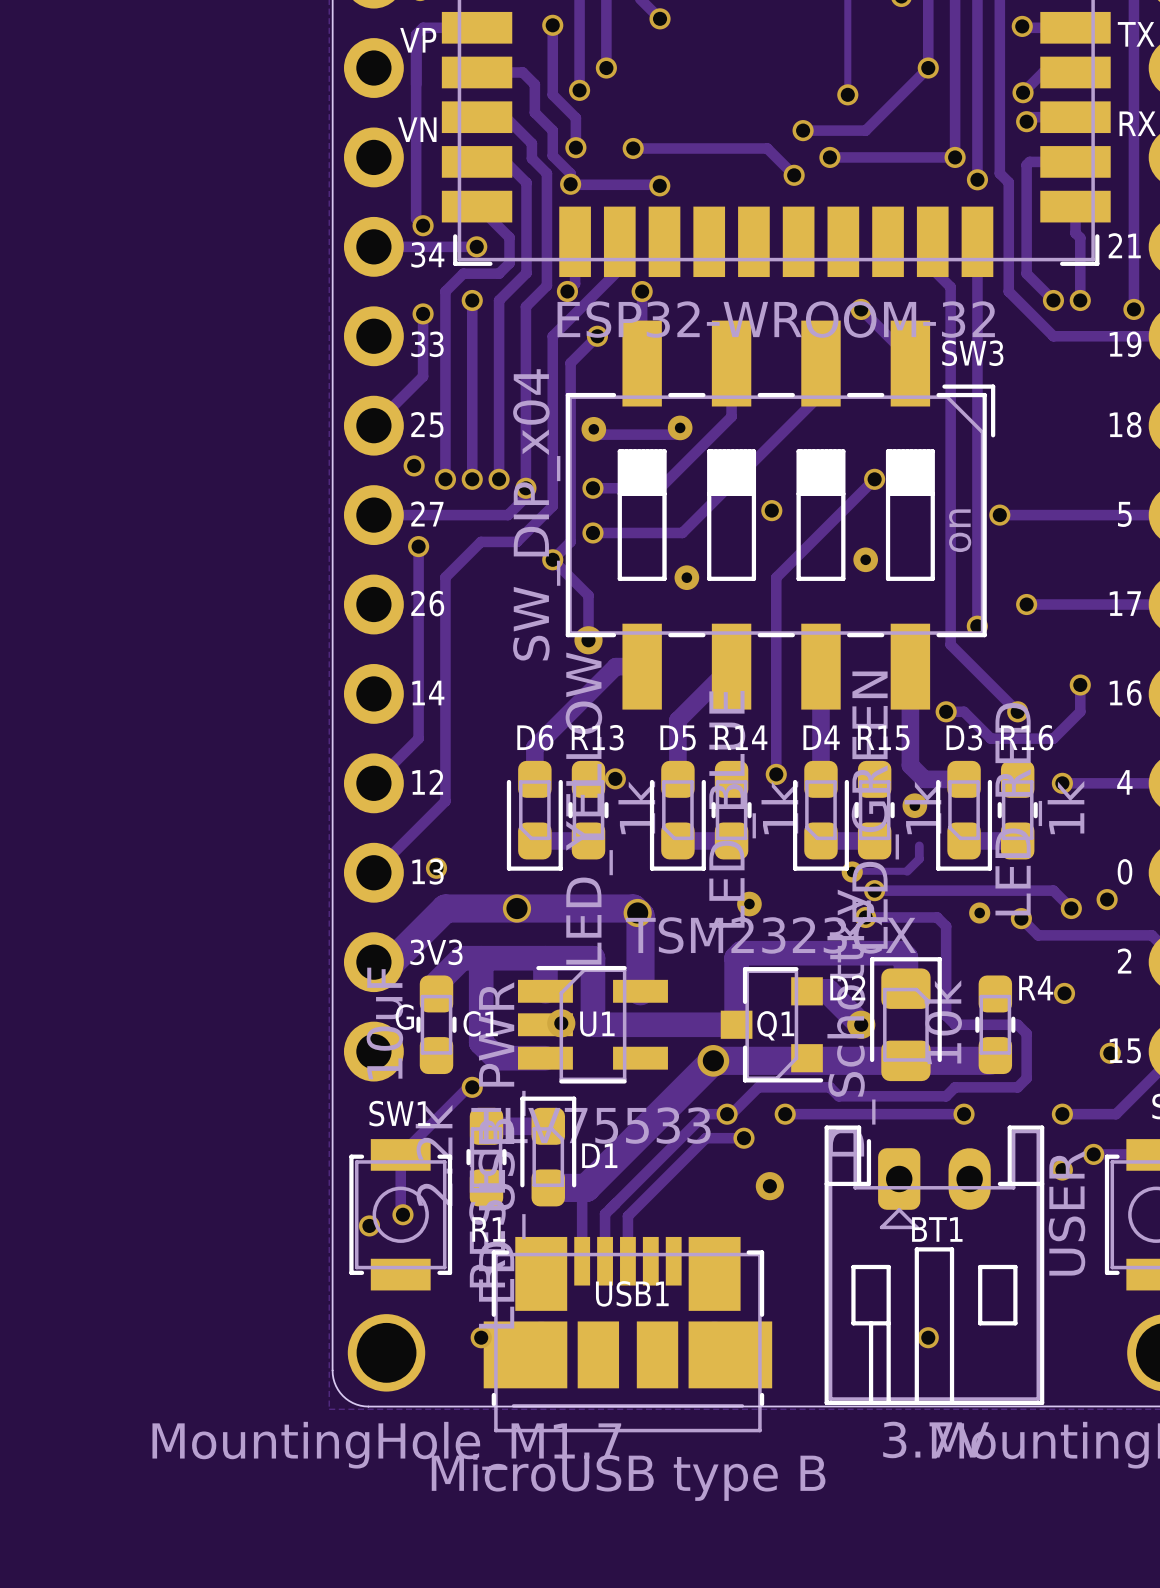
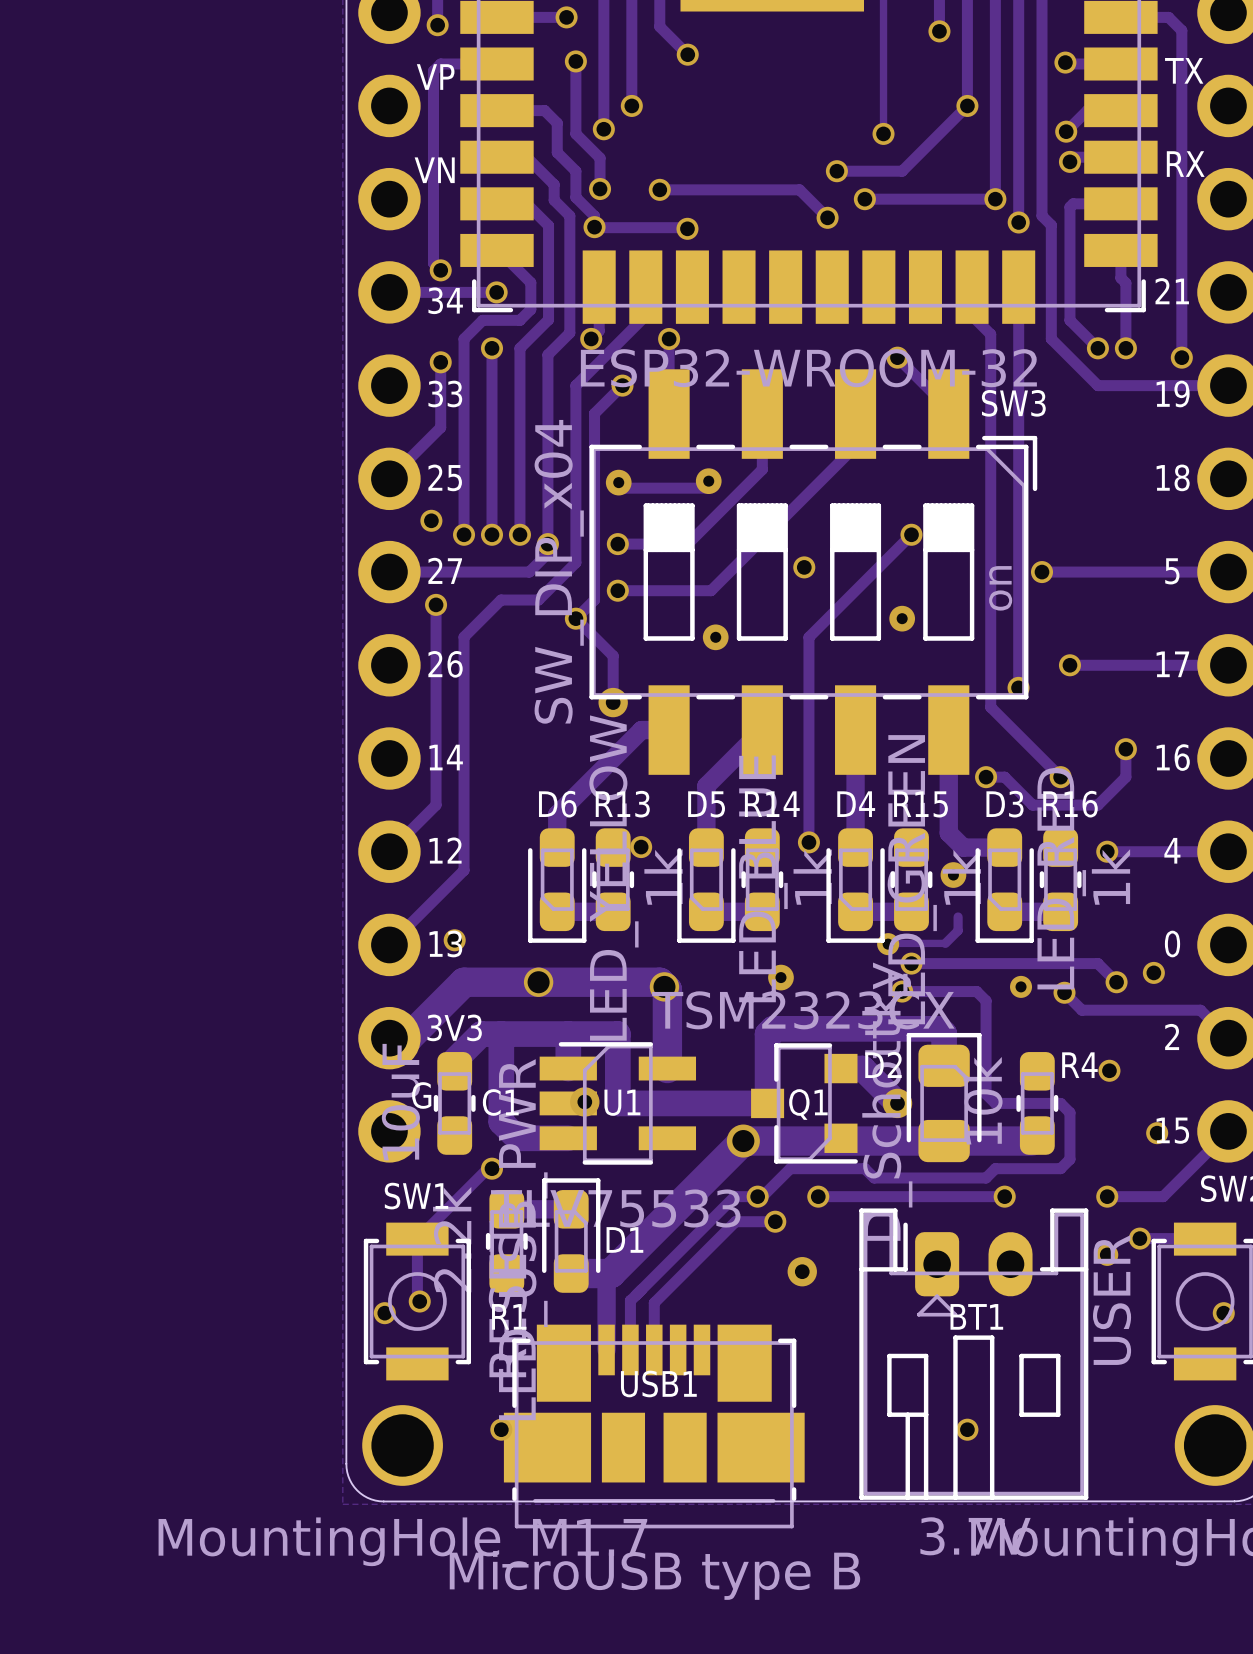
track width: thin (582, 1192) (582, 1261) -> thick (606, 1277) (606, 1349)

